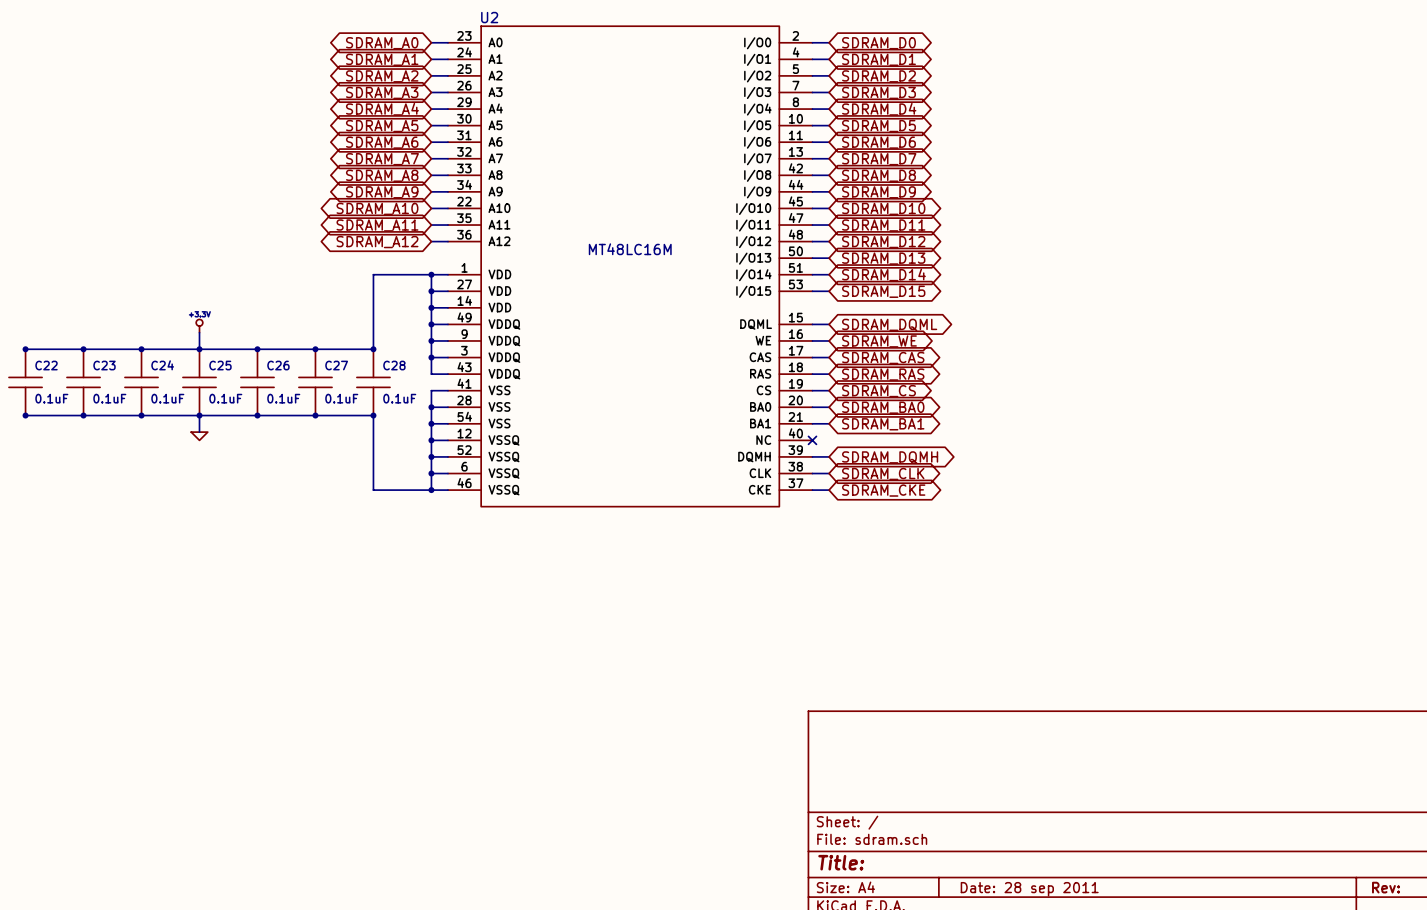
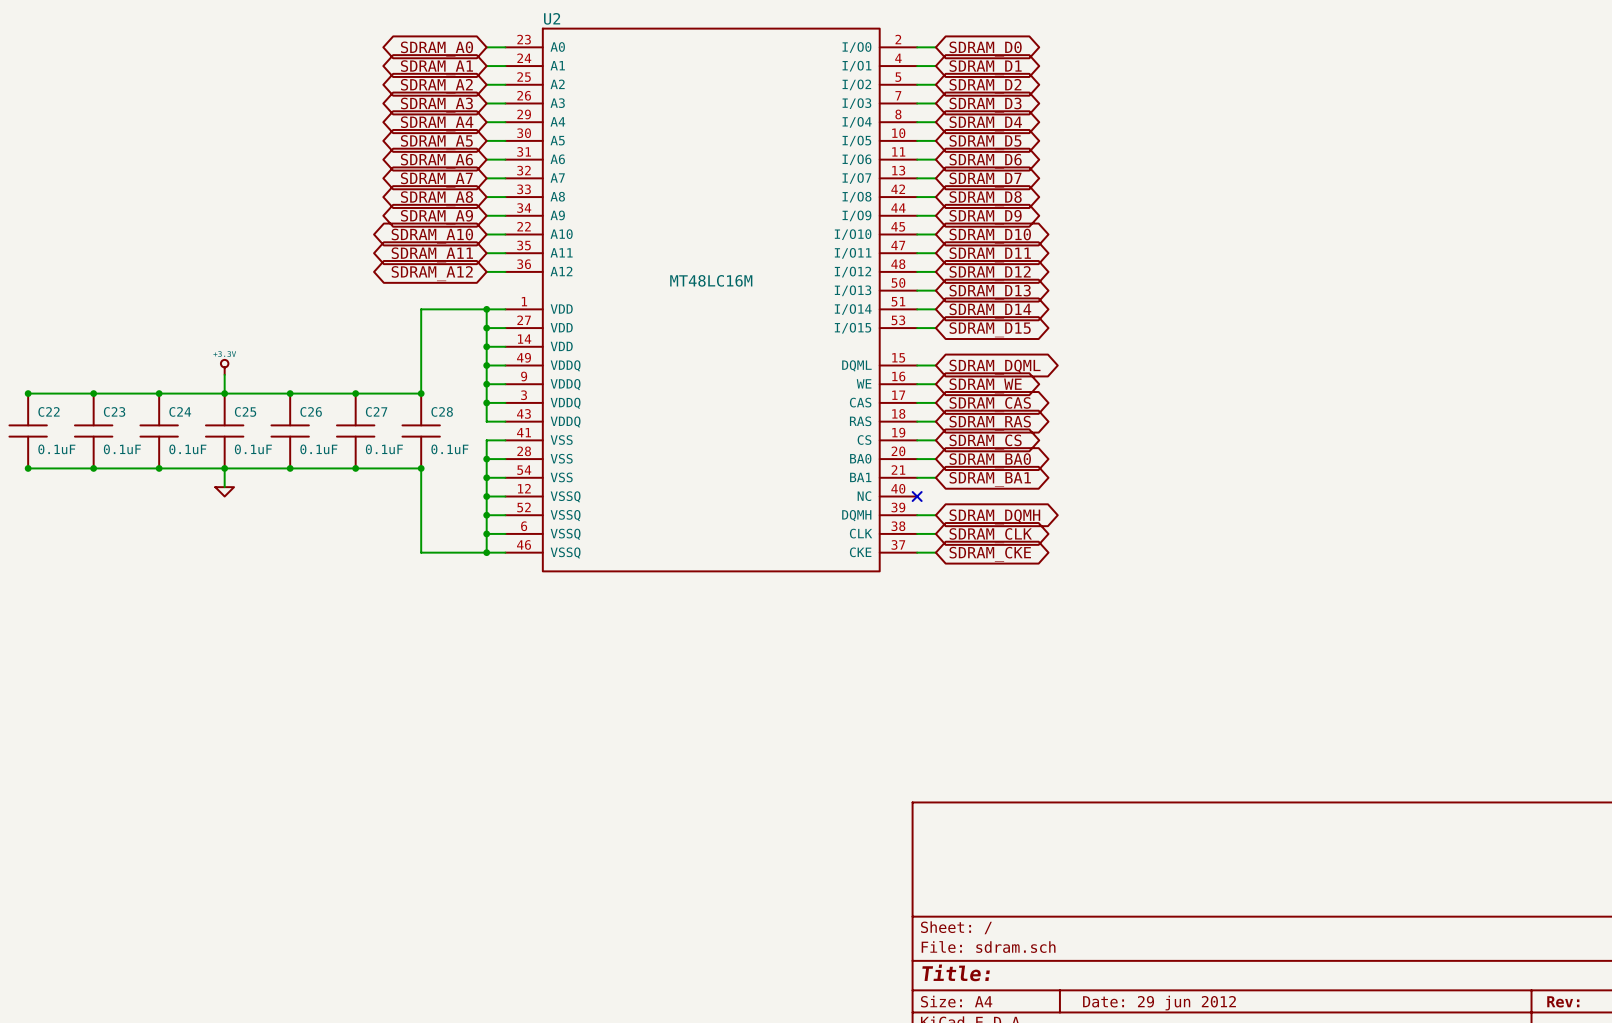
title block: Date: 28 sep 2011 (1029, 889) -> Date: 29 jun 2012 (1159, 1003)

